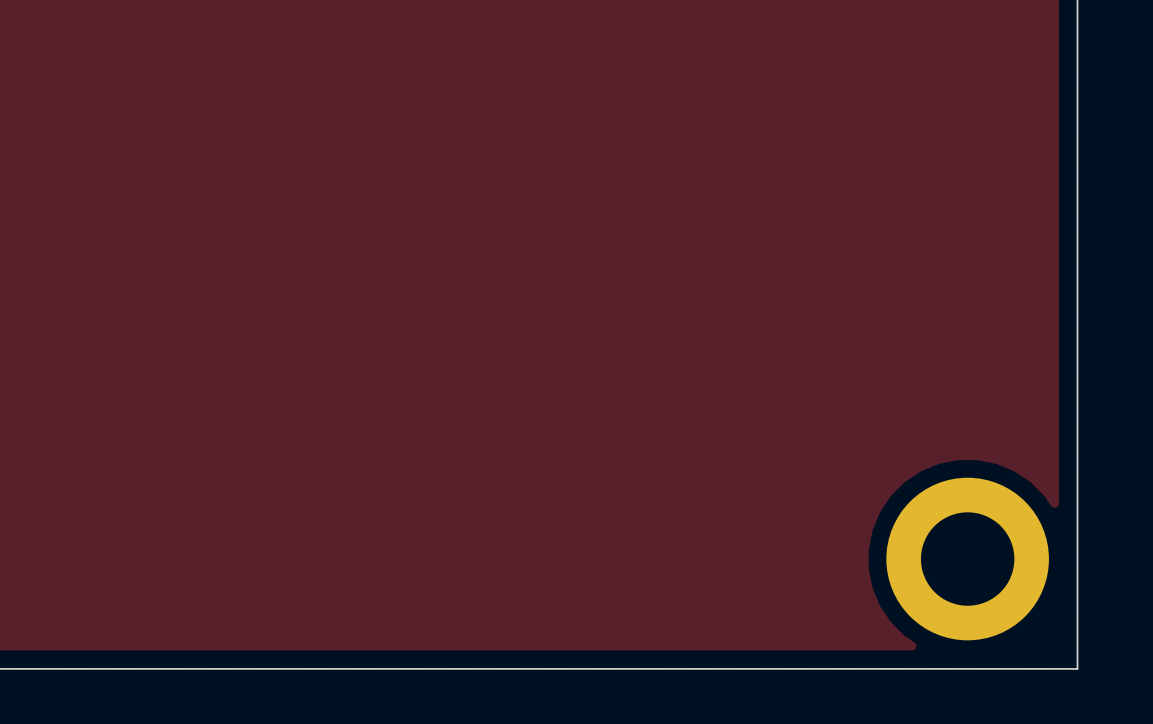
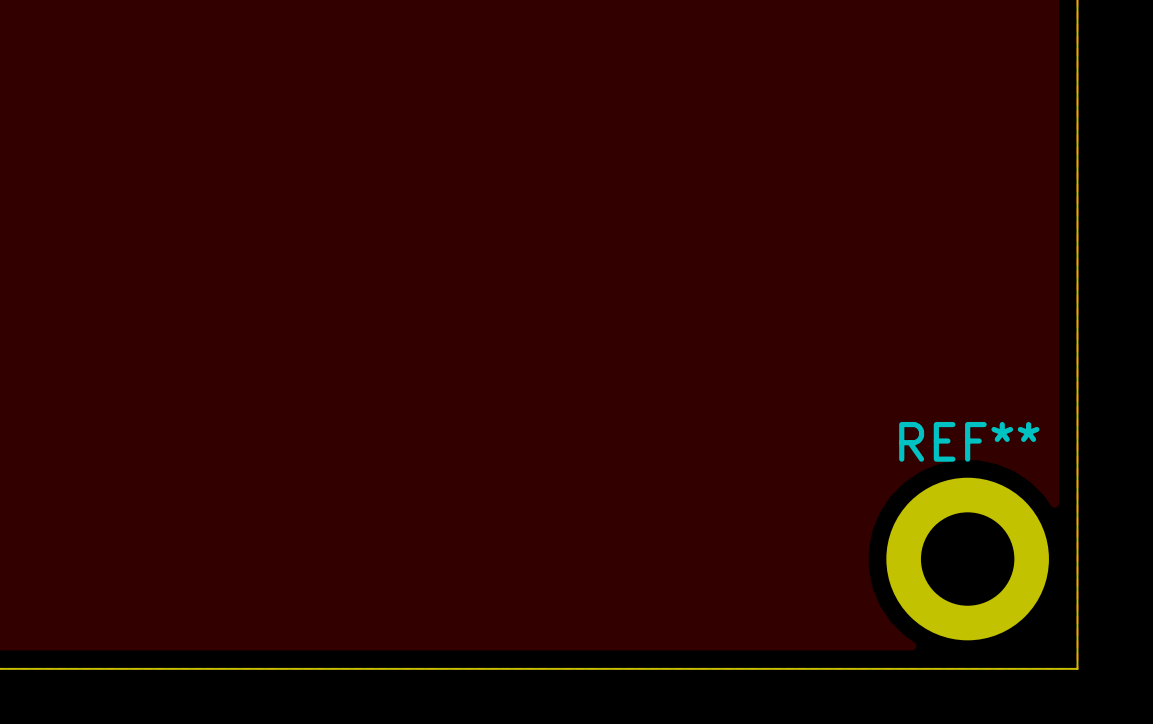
REF** name: none -> REF** (969, 441)

